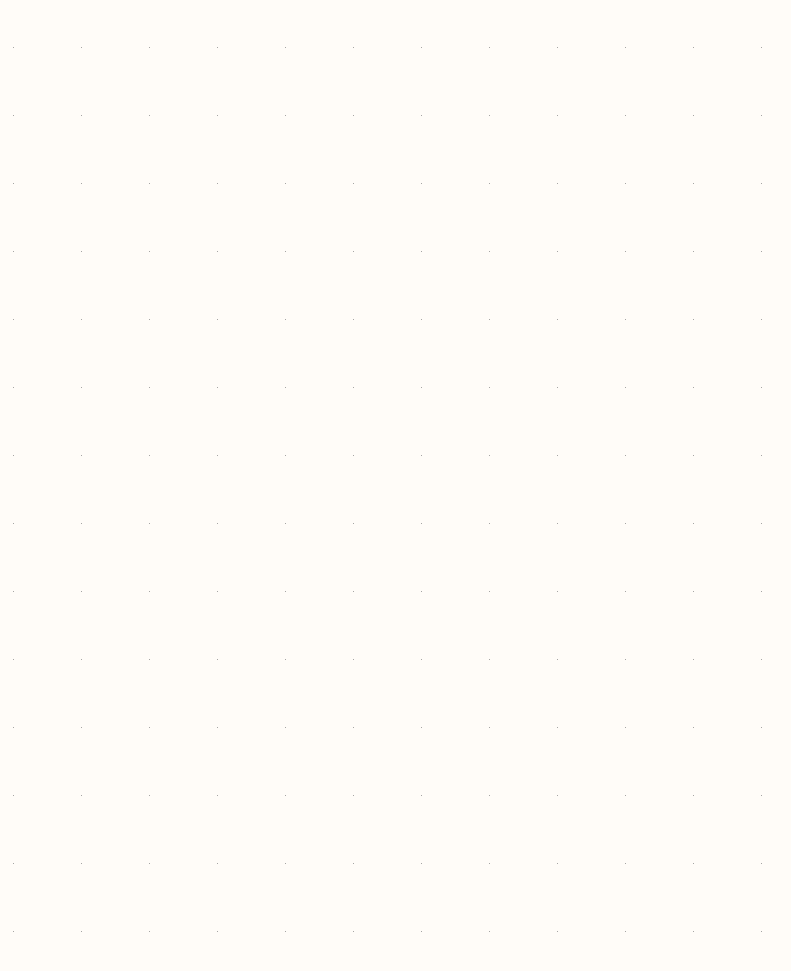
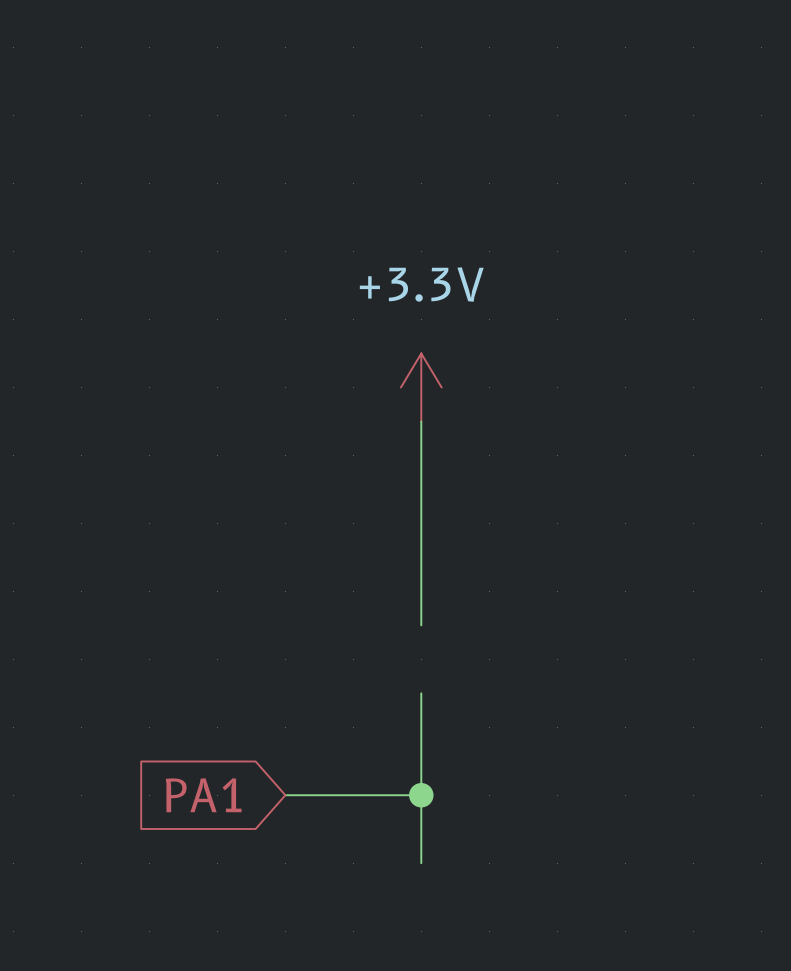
power symbol: none -> +3.3V (421, 387)
wire: none -> (421, 421) (421, 625)
wire: none -> (421, 693) (421, 863)
global label: none -> PA1 (203, 795)
wire: none -> (285, 795) (421, 795)
junction: none -> (421, 795)

